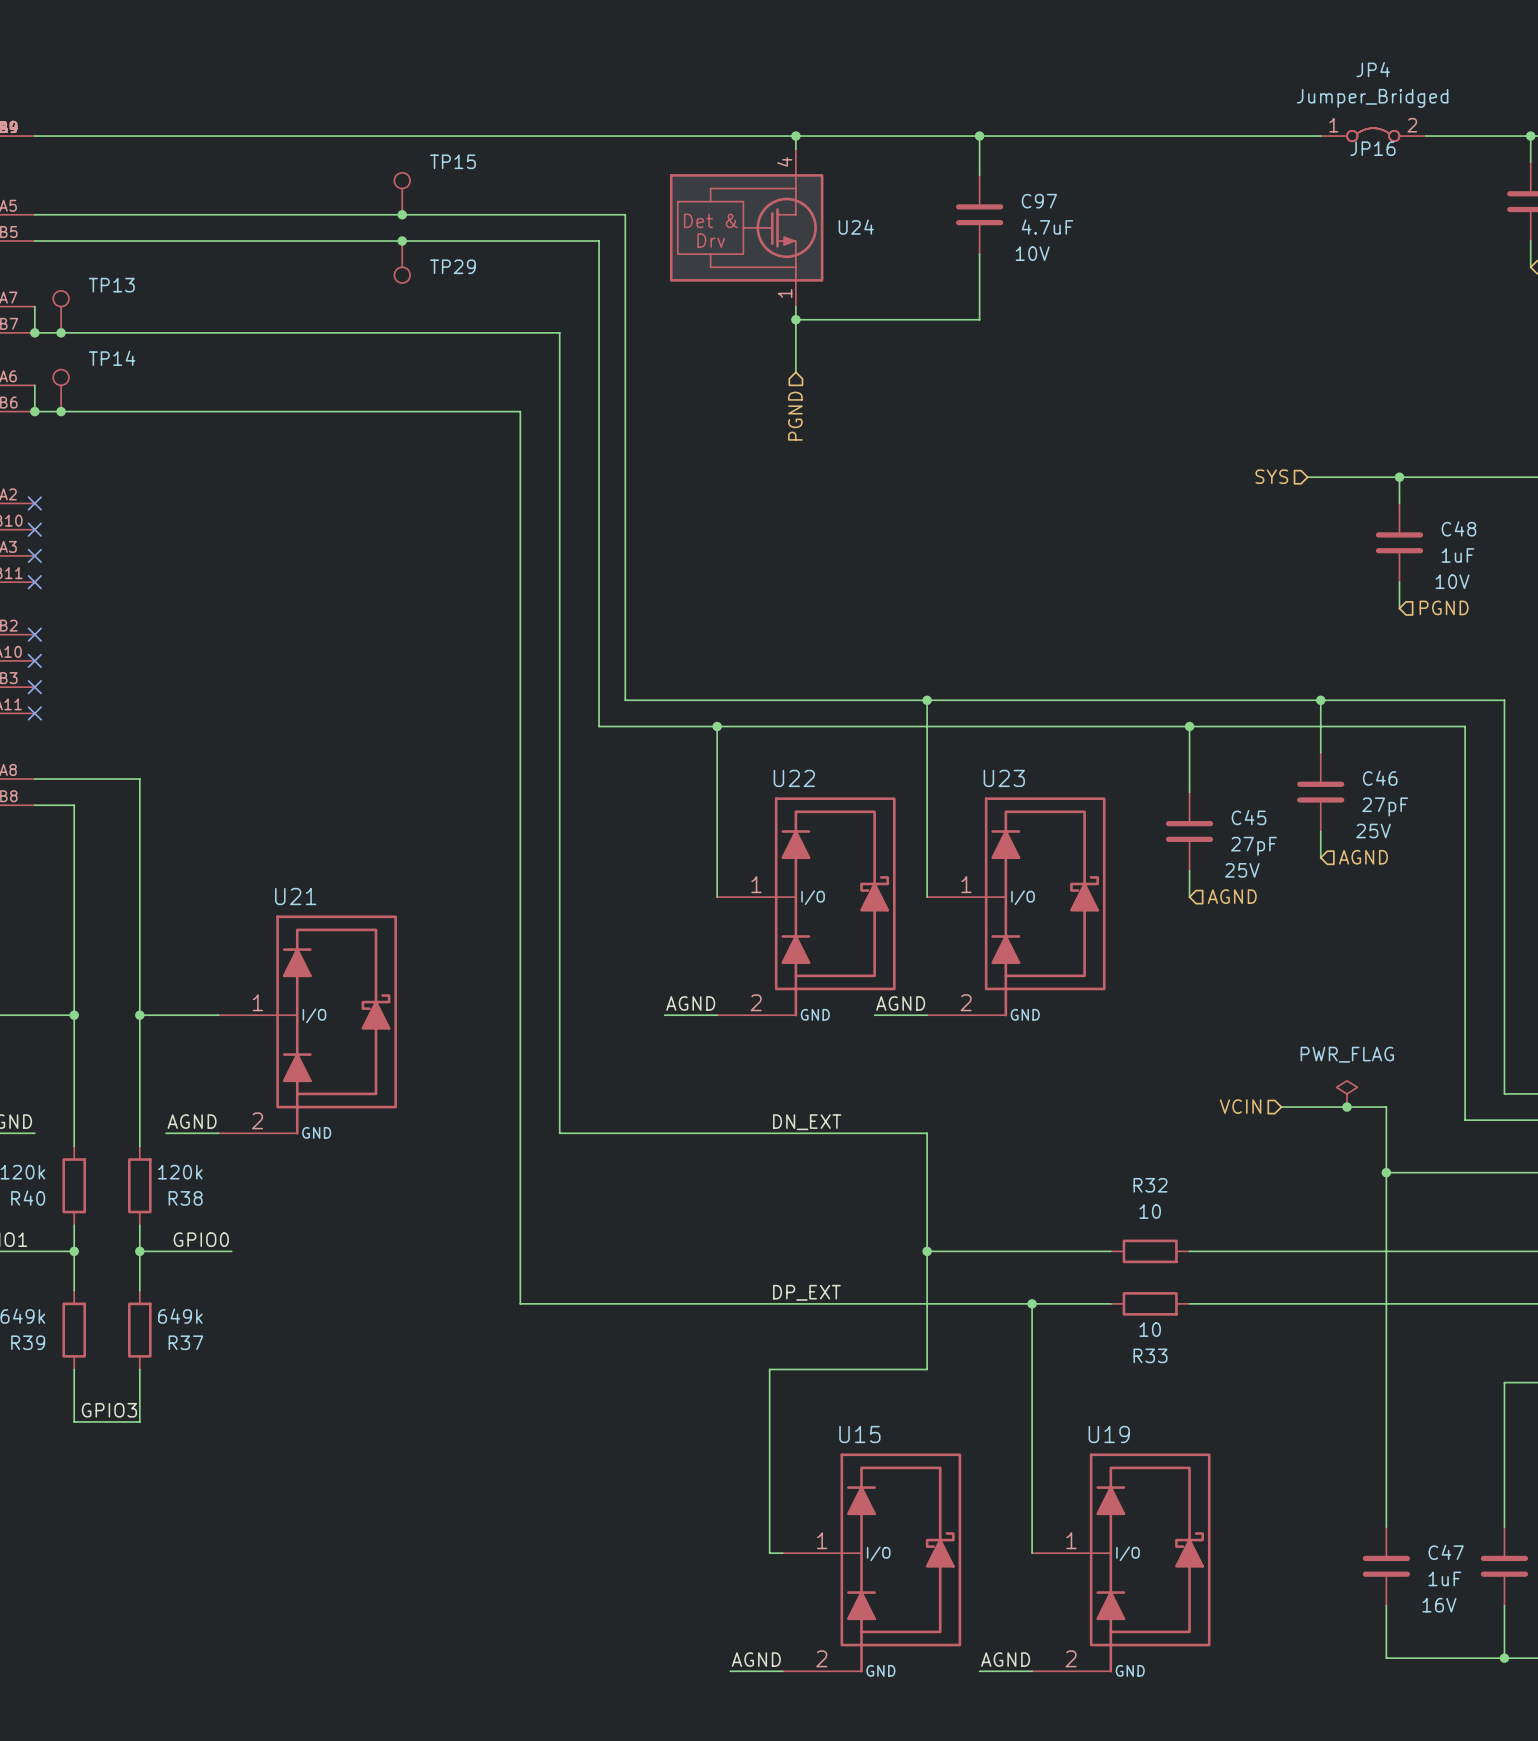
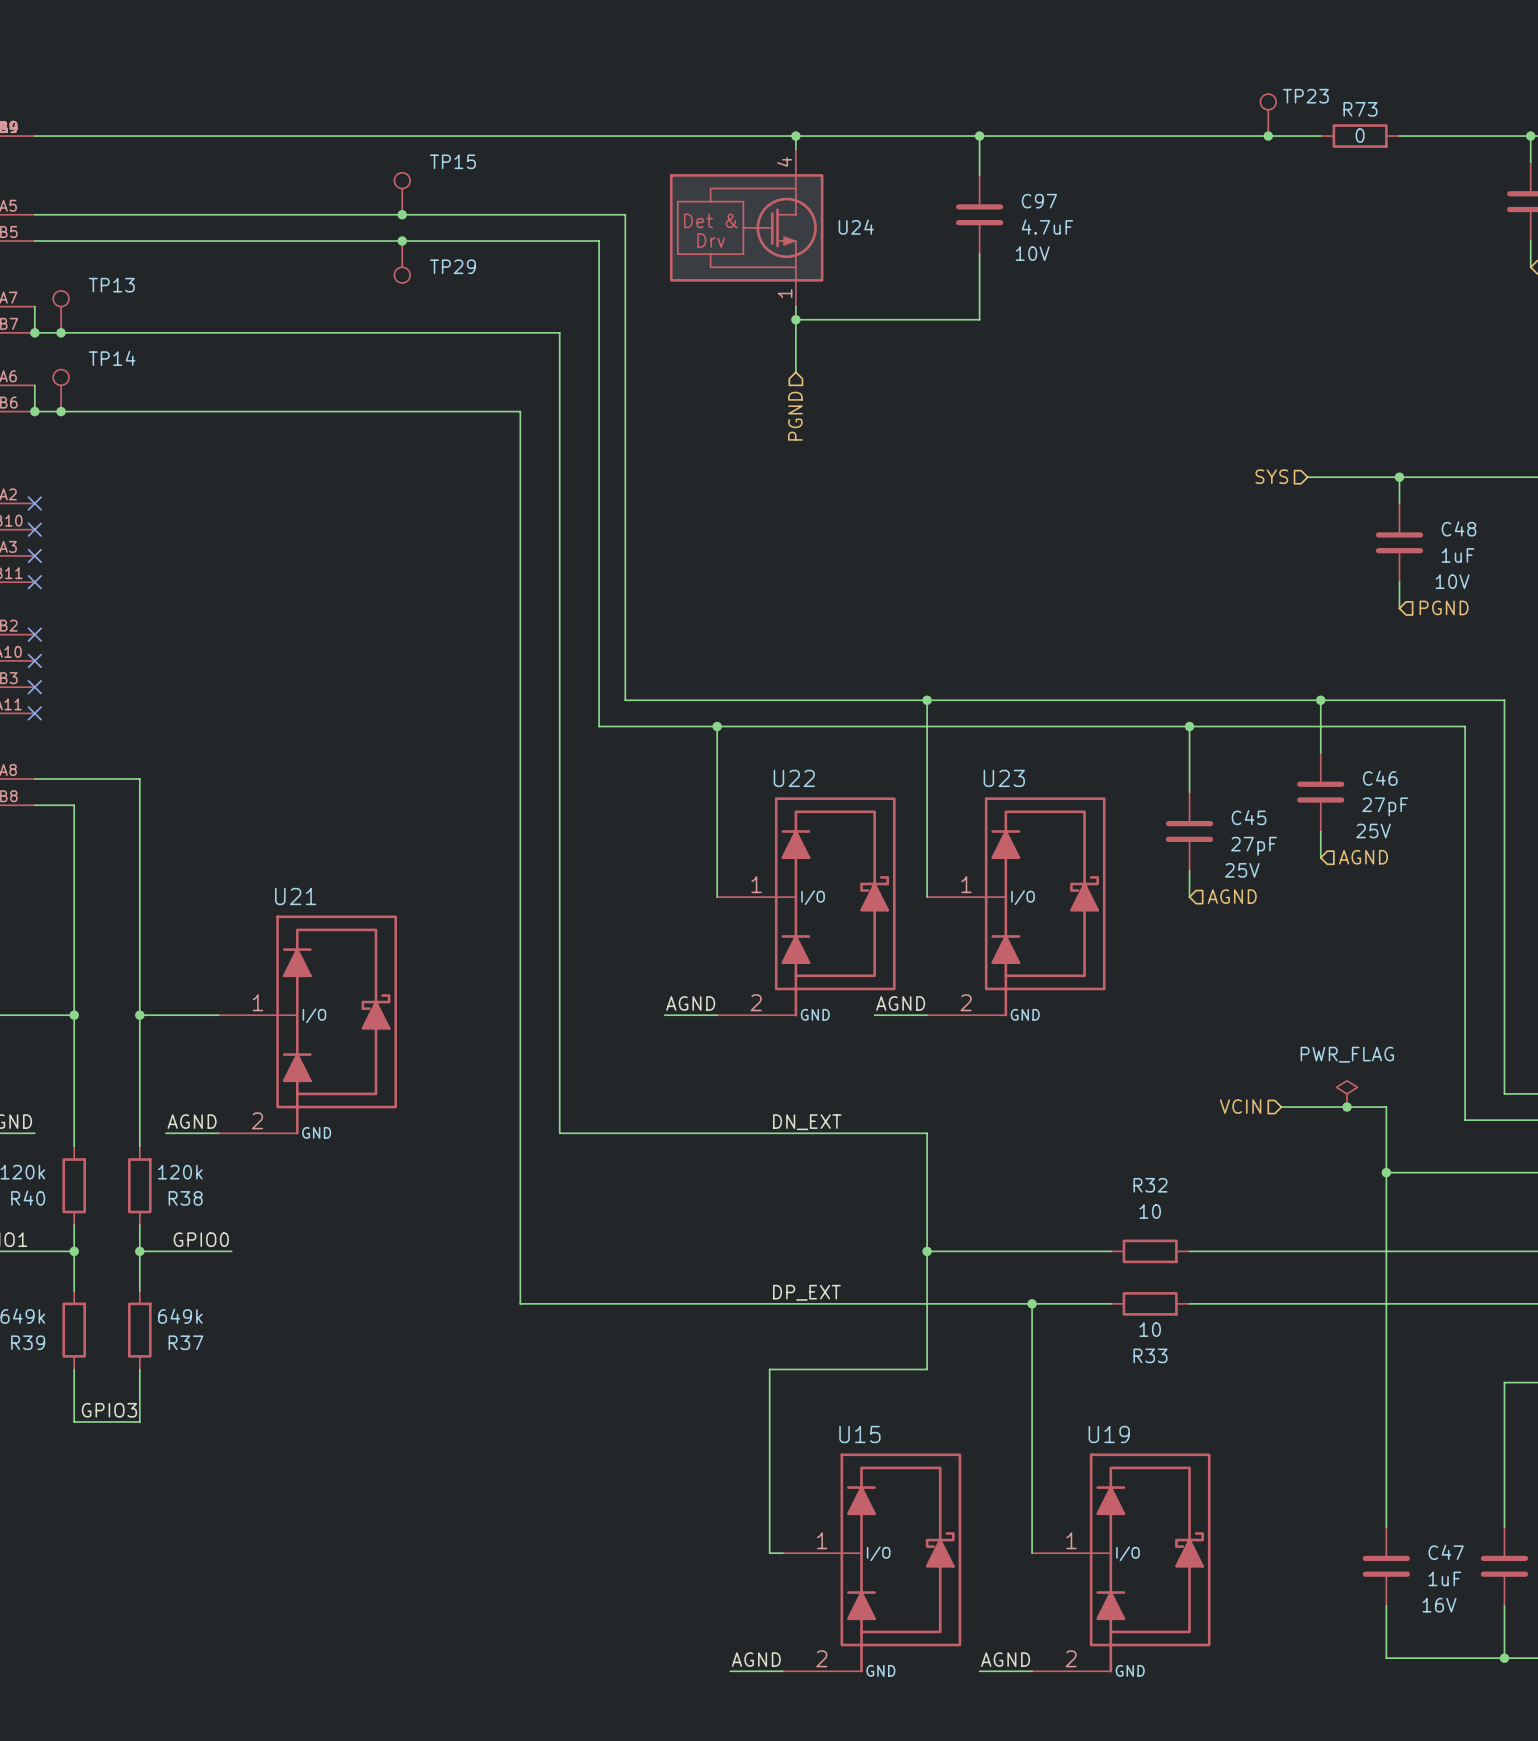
TP23: none -> (1268, 115)
JP16: (1373, 134) -> none
JP4: Jumper_Bridged (1373, 134) -> none
junction: none -> (1268, 136)
R73: none -> 0 (1360, 136)

